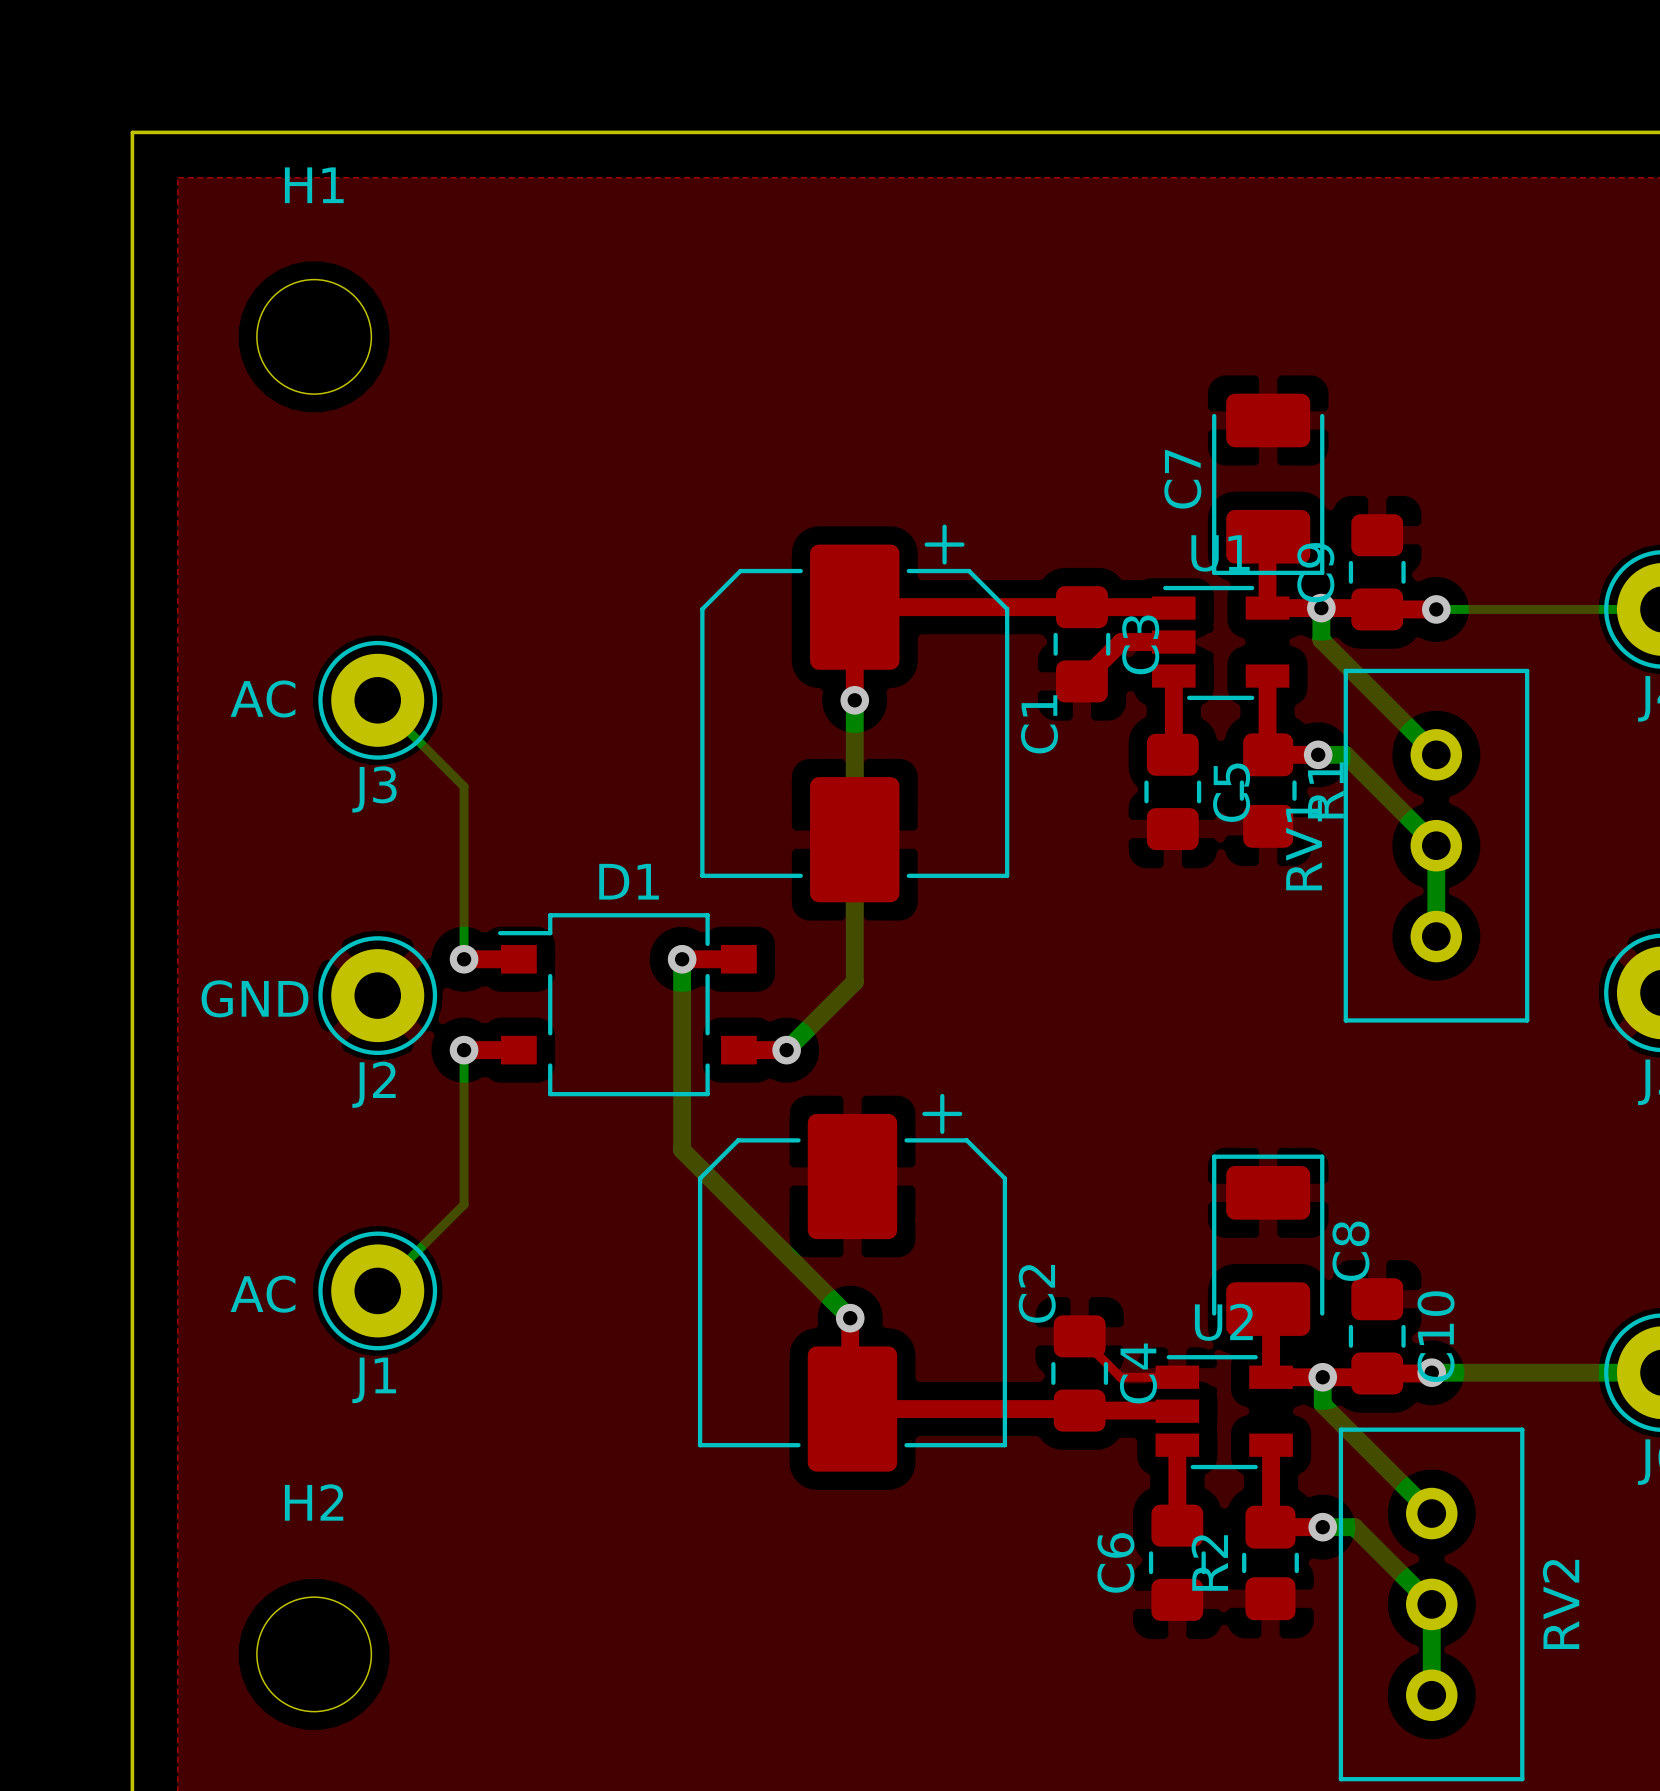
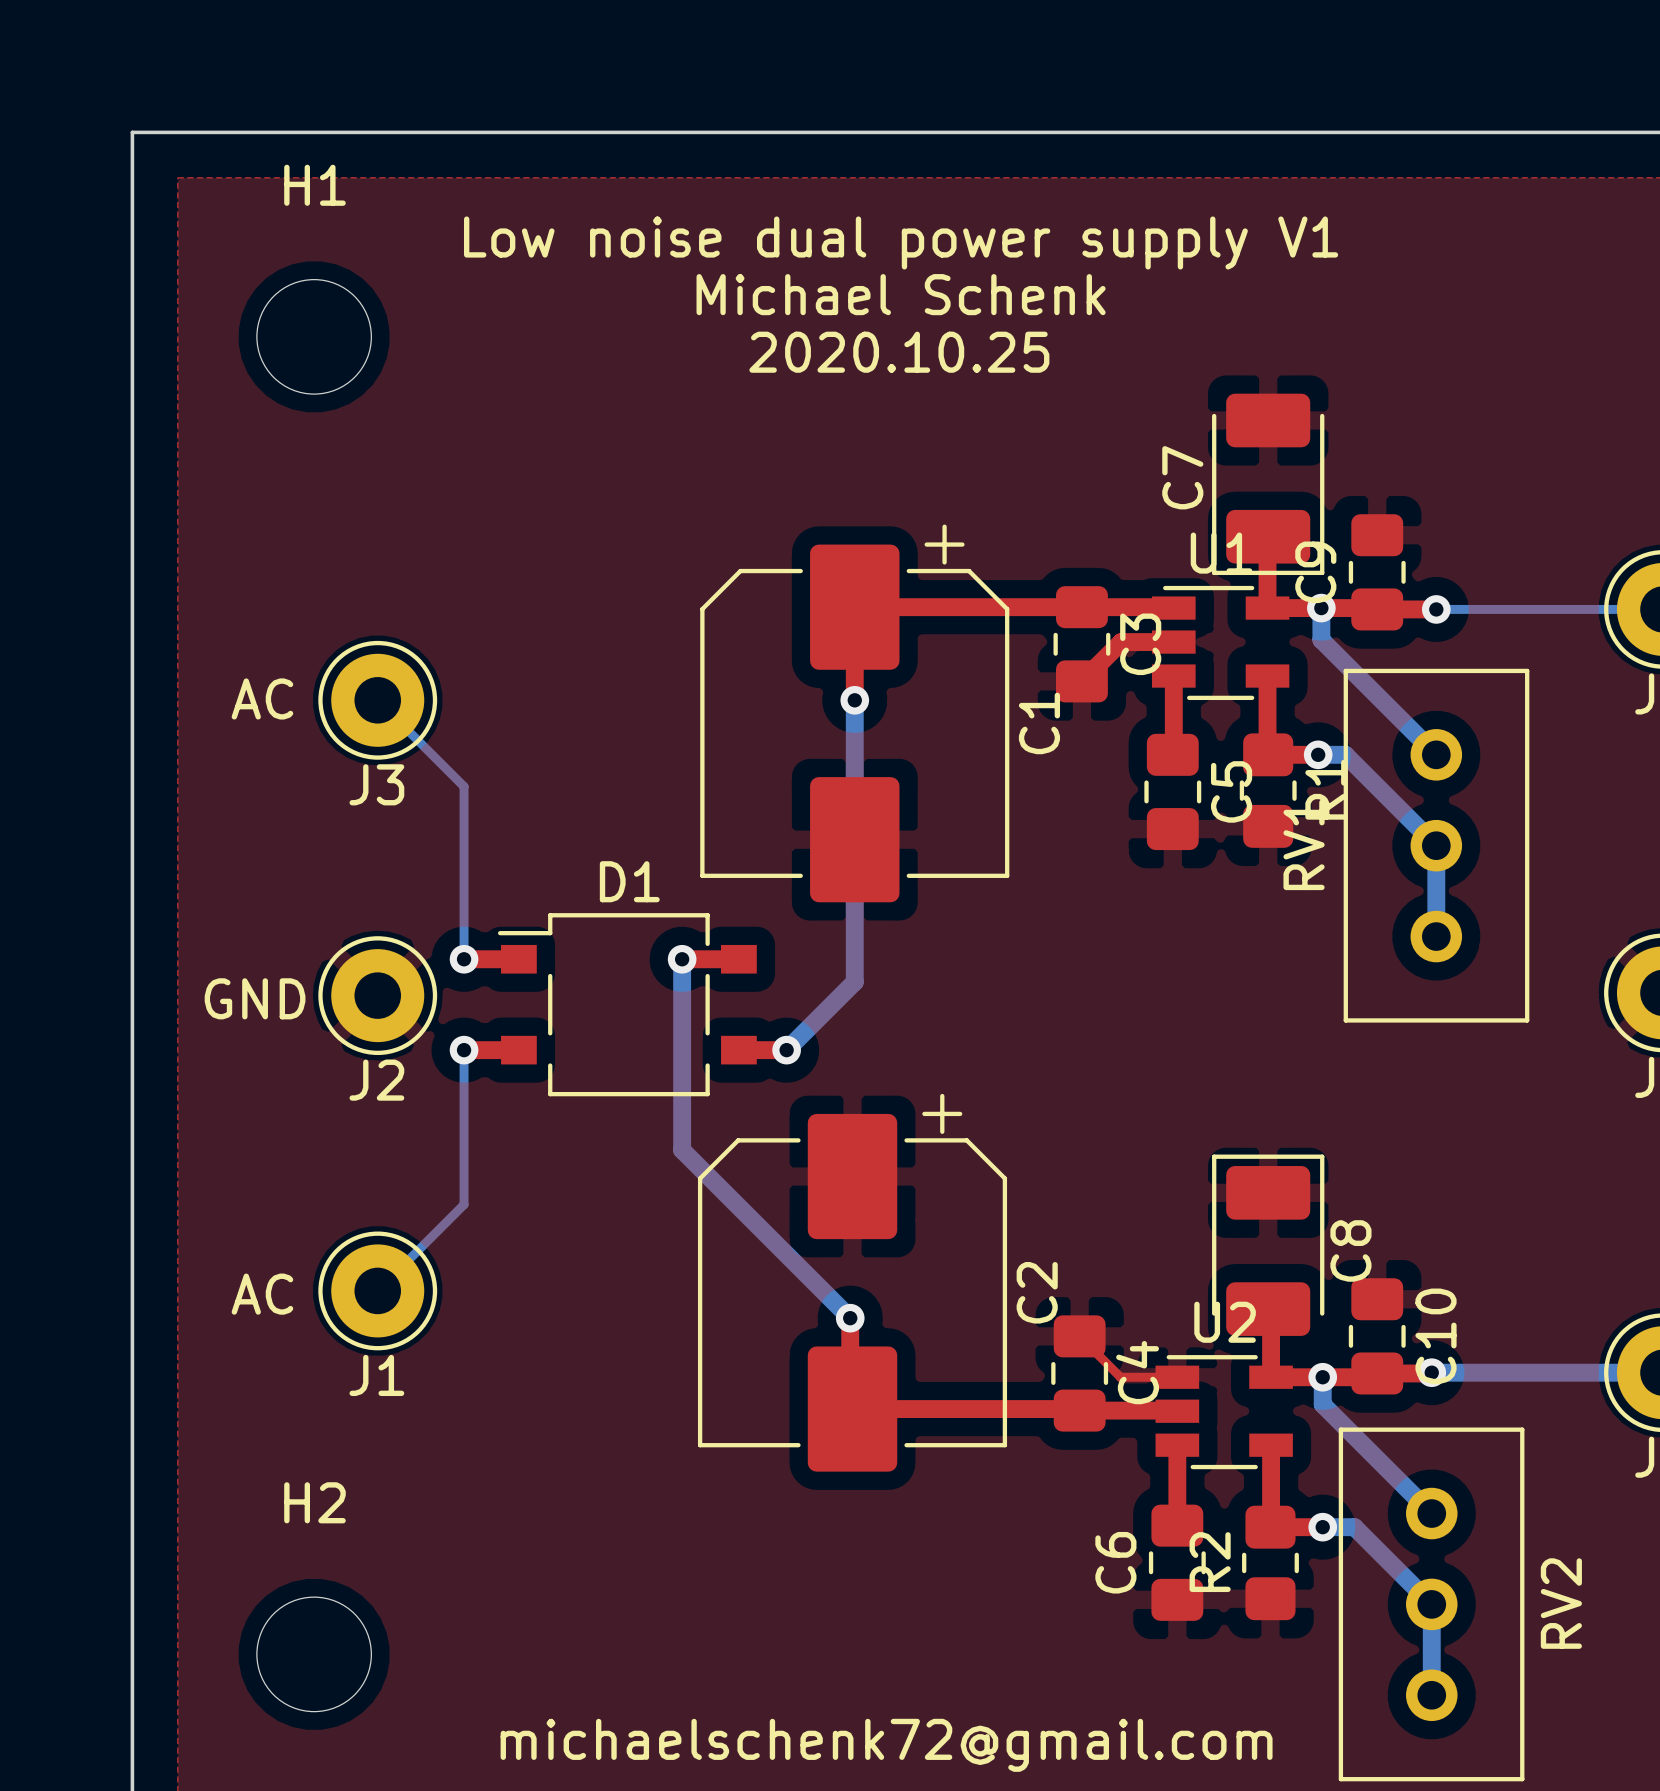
text: none -> Low noise dual power supply V1 (901, 242)
text: none -> Michael Schenk (901, 294)
text: none -> 2020.10.25 (899, 352)
text: none -> michaelschenk72@gmail.com (886, 1745)

